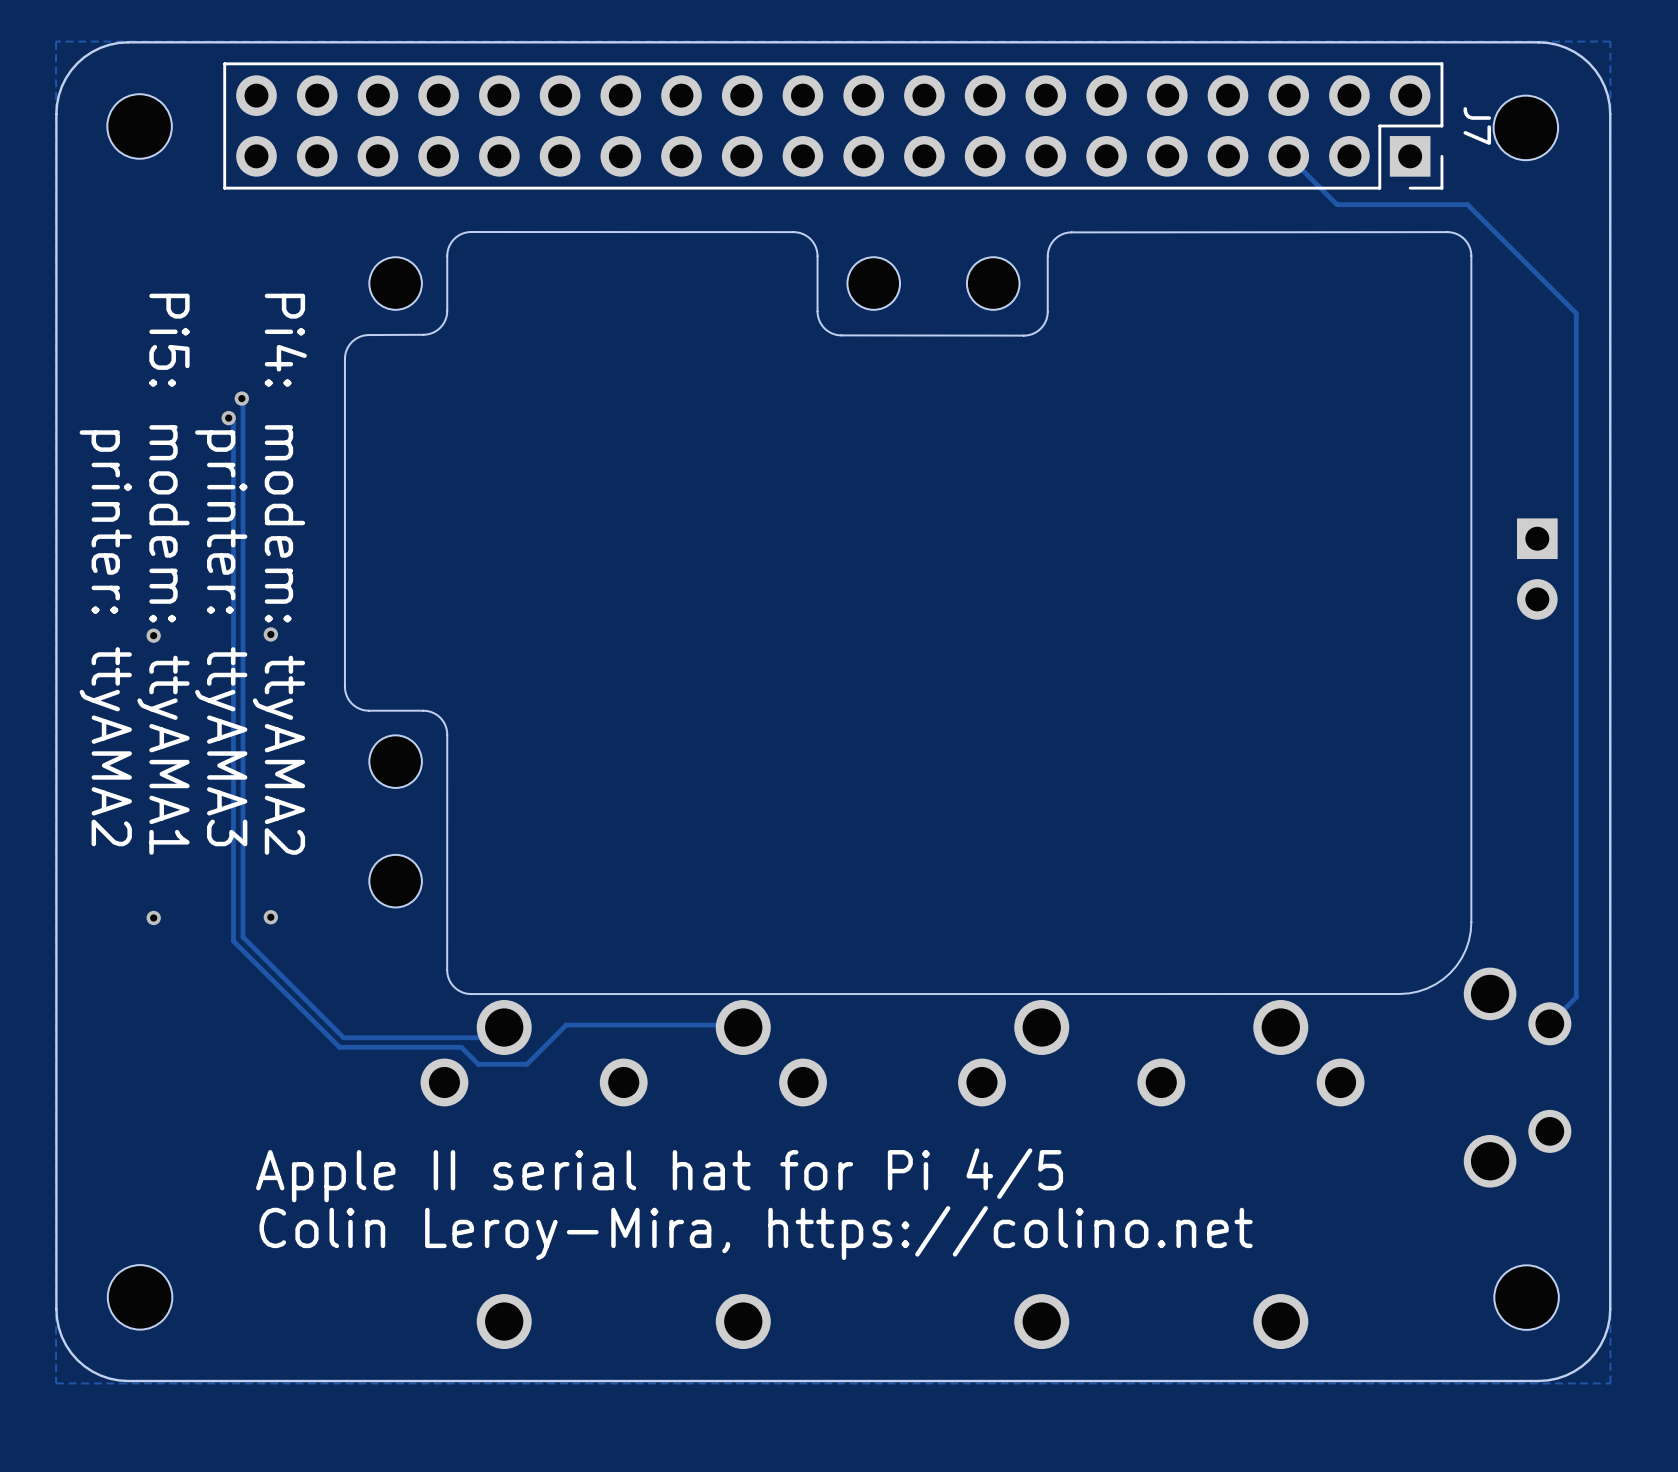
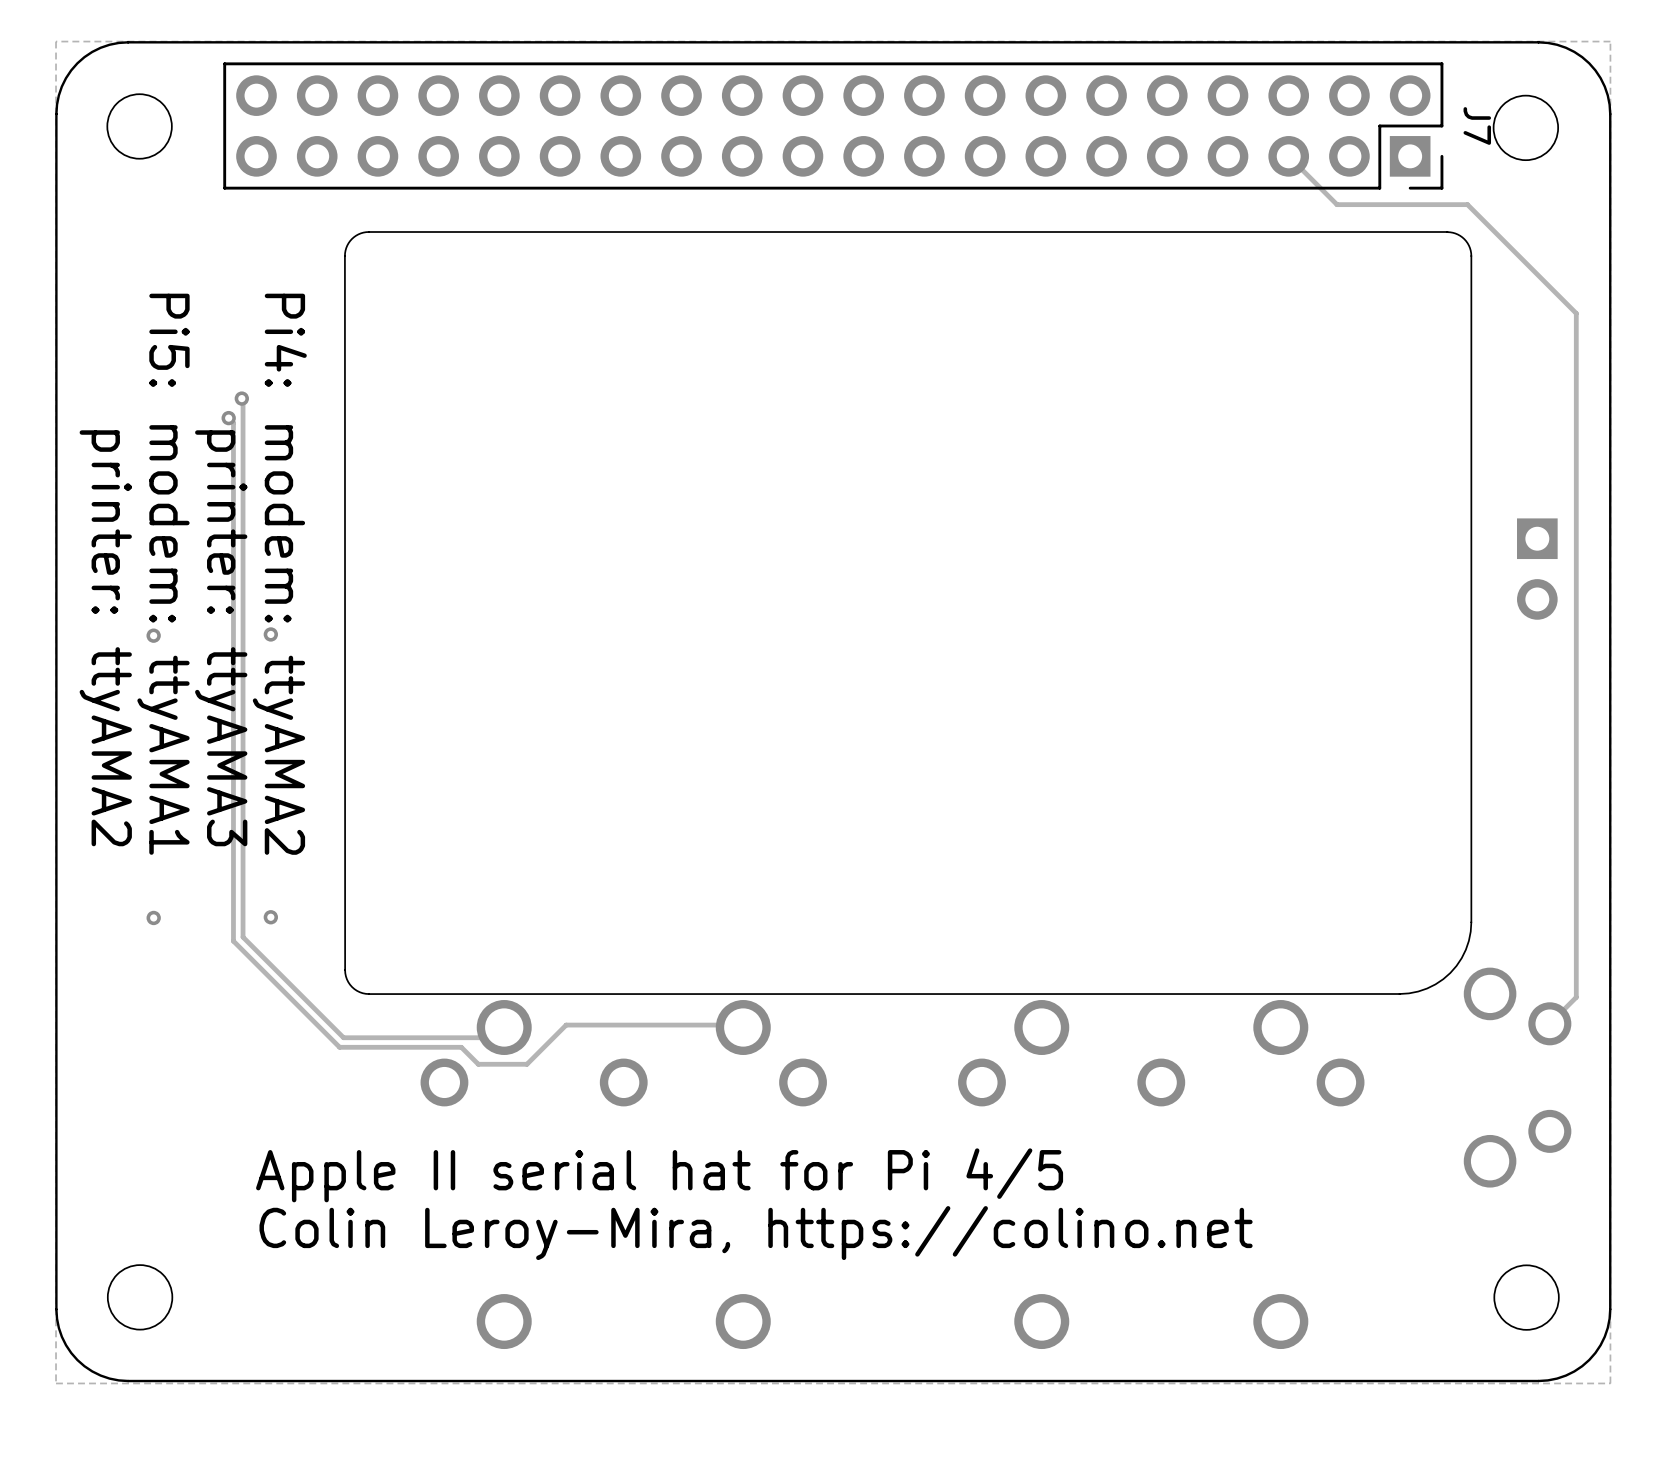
board edge: (1447, 232) (1066, 232) (1054, 239) (1048, 250) (1046, 319) (1038, 330) (1023, 335) (841, 335) (831, 333) (822, 326) (818, 316) (817, 256) (815, 246) (808, 237) (796, 232) (471, 232) (456, 237) (447, 250) (447, 314) (440, 327) (426, 334) (362, 335) (351, 342) (345, 352) (344, 686) (348, 698) (359, 708) (428, 711) (438, 715) (445, 726) (447, 973) (454, 987) (461, 992) (471, 994) -> (1447, 232) (368, 232) (353, 237) (347, 245) (344, 255) (345, 973) (352, 987) (365, 993) (471, 994)
part: (395, 283) -> none
part: (873, 283) -> none
part: (993, 283) -> none
part: (395, 761) -> none
part: (395, 881) -> none

